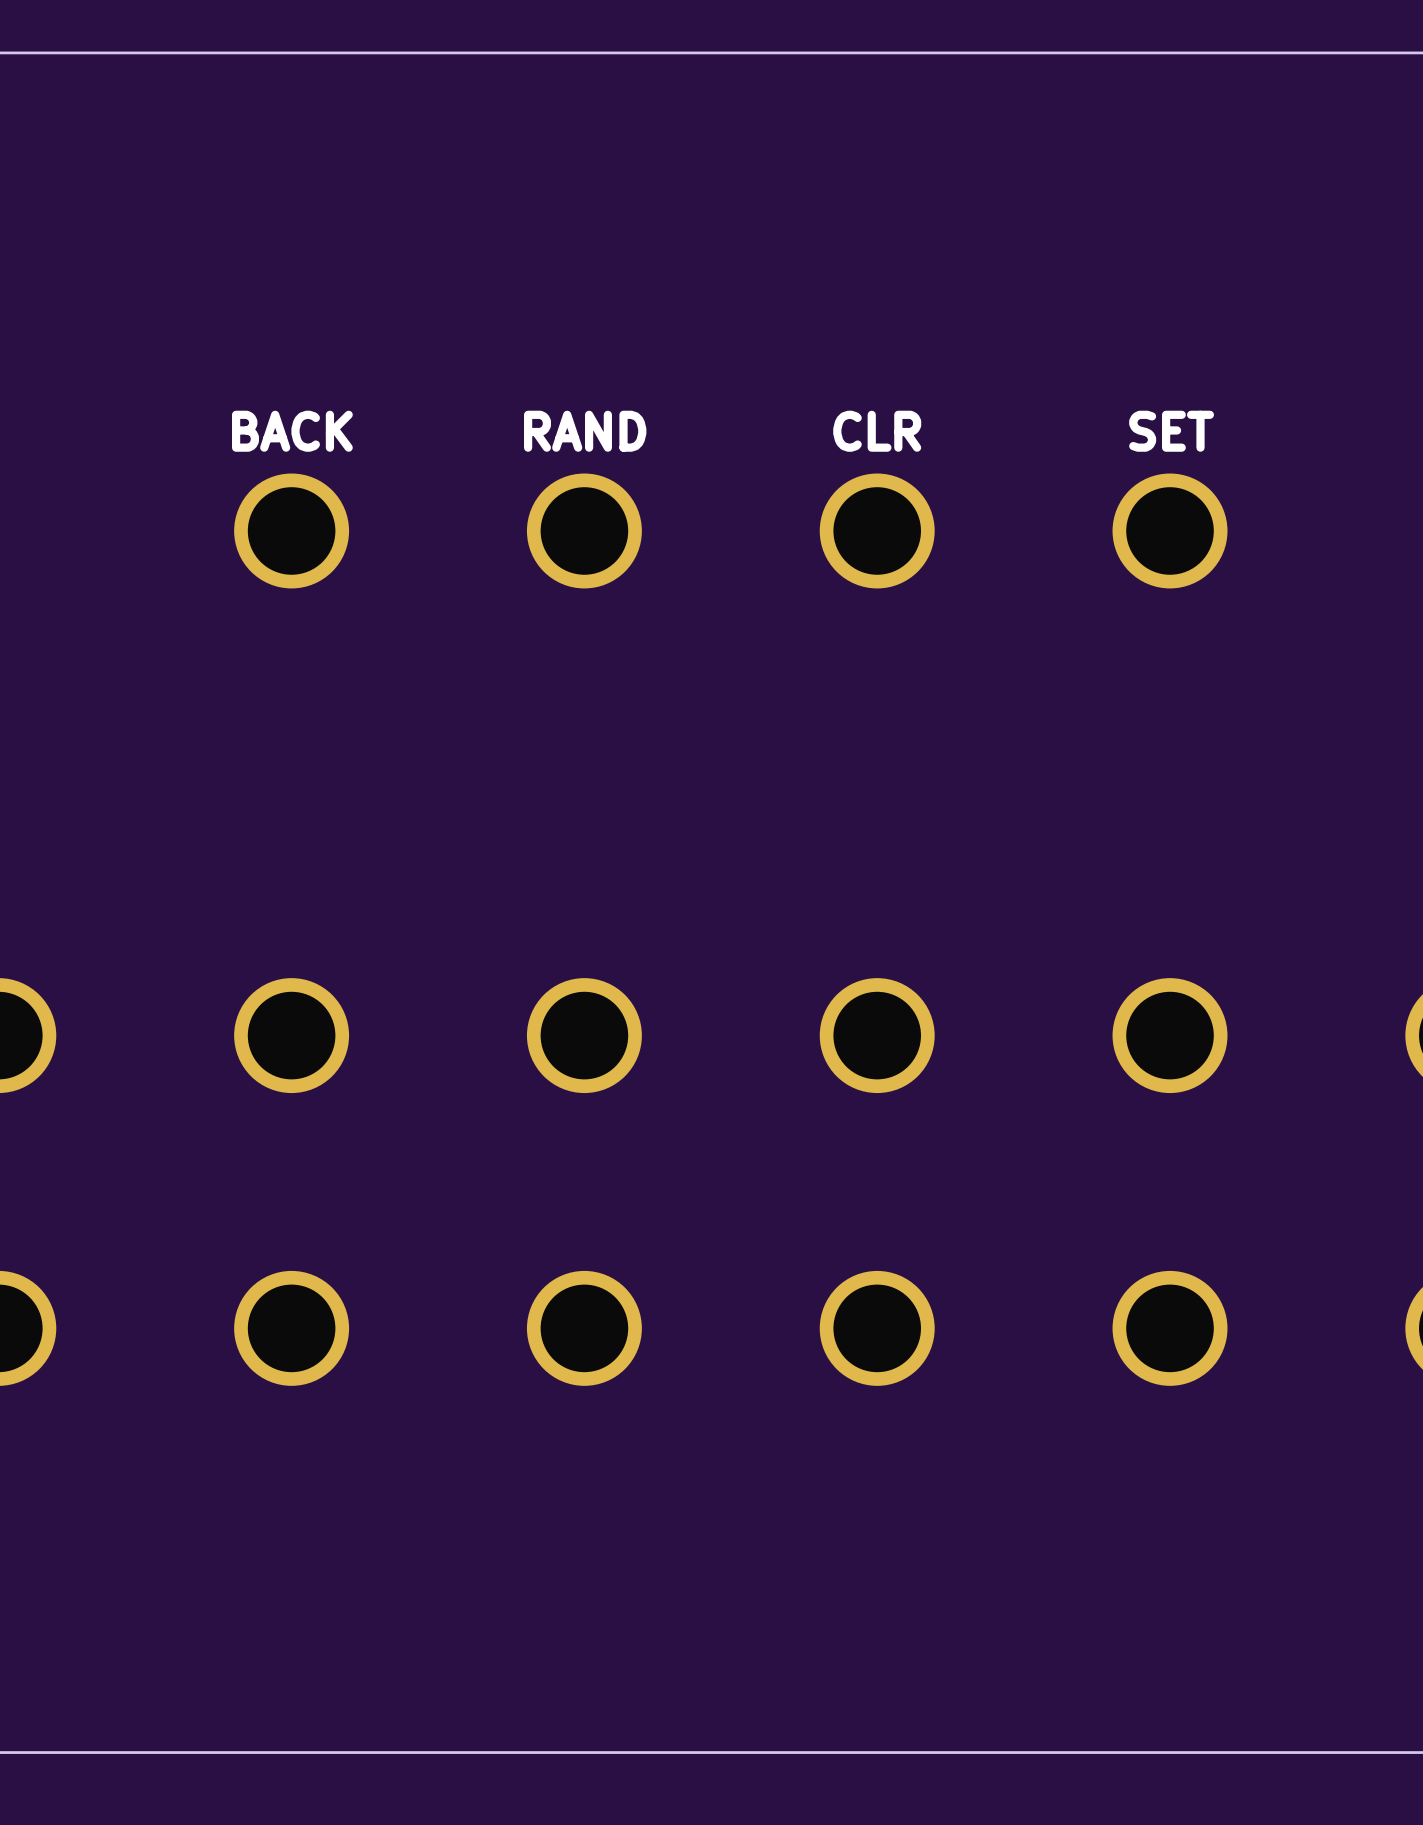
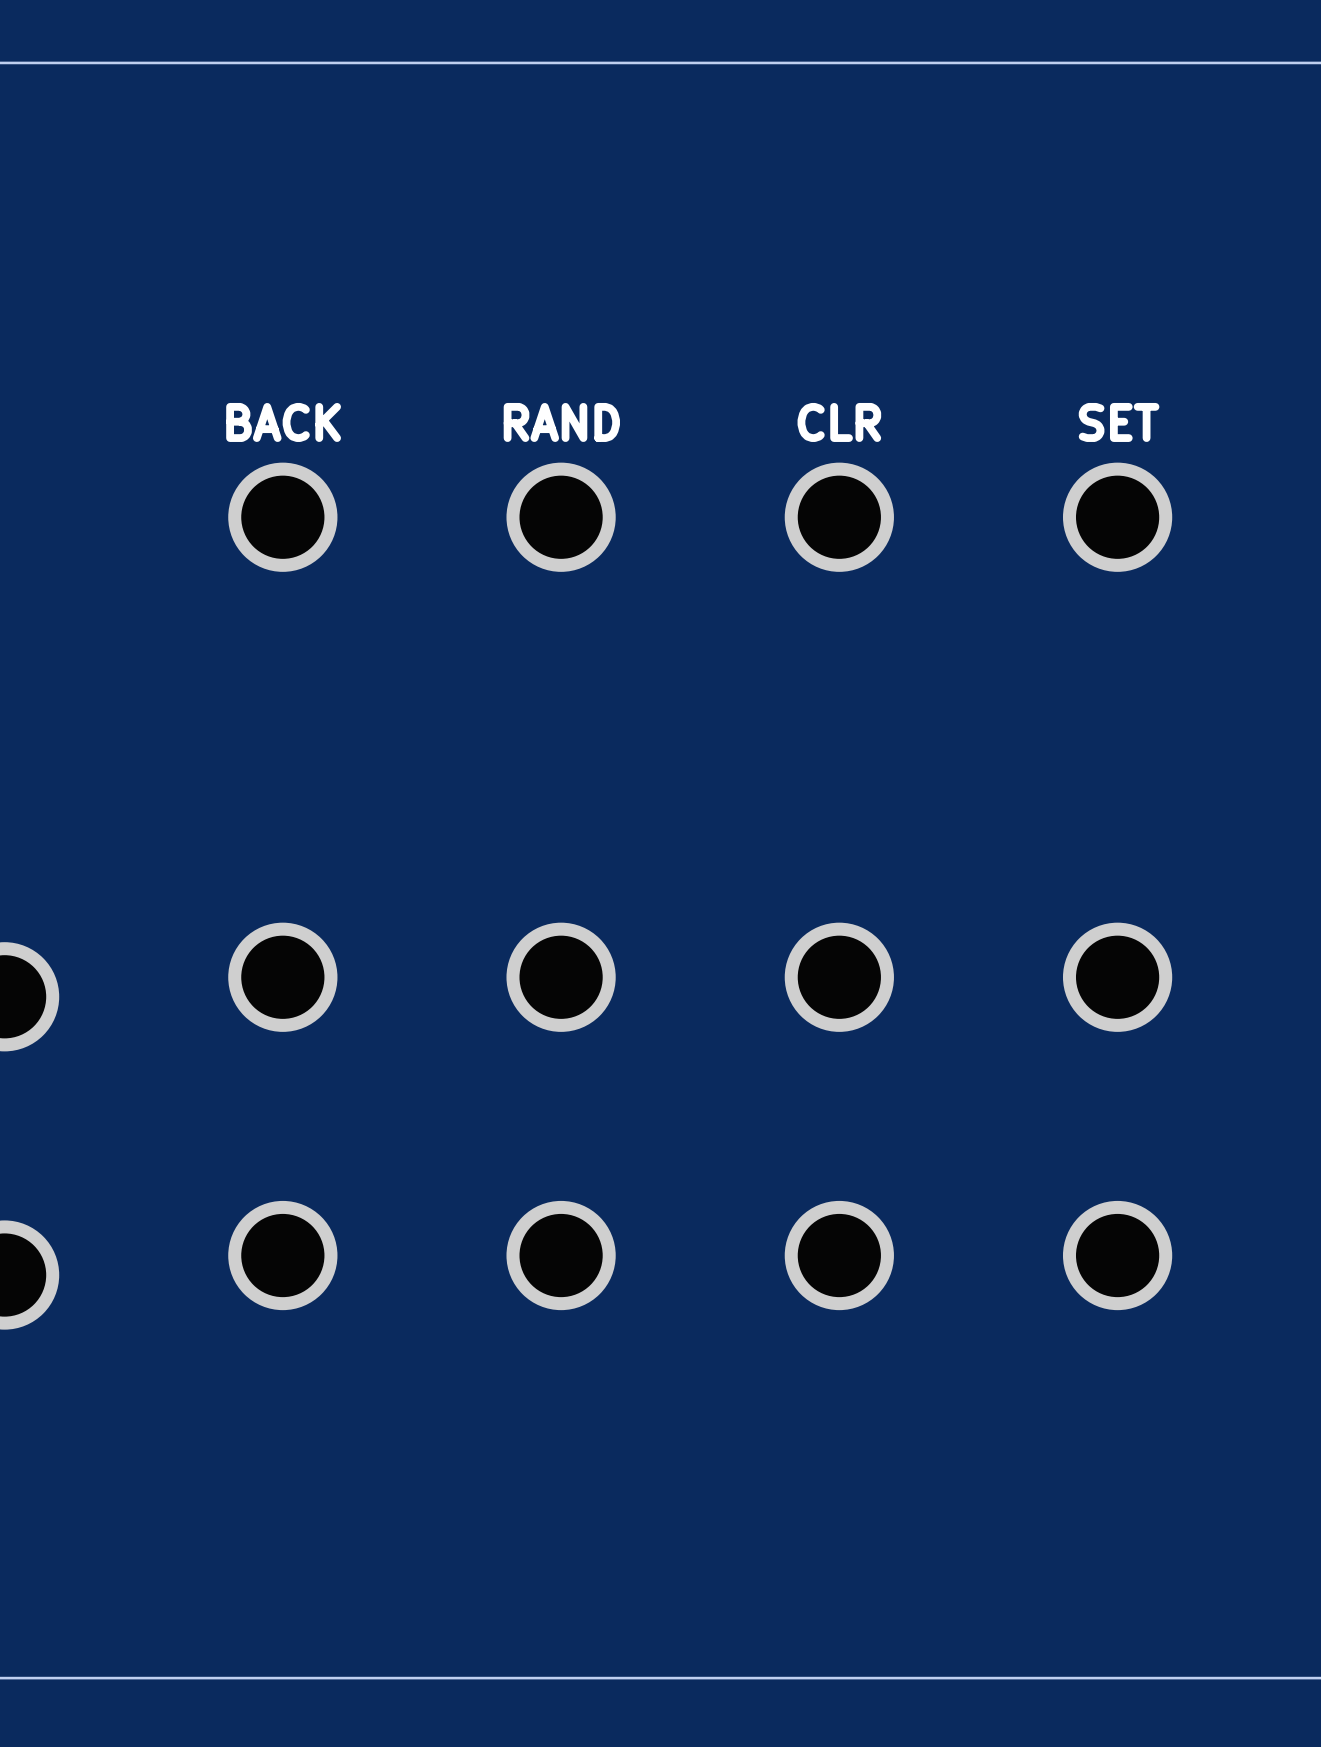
part position: (291, 1035) -> (282, 977)
part position: (584, 1035) -> (561, 977)
part position: (877, 1035) -> (839, 977)
part position: (1170, 1035) -> (1117, 977)
part position: (291, 1328) -> (282, 1255)
part position: (584, 1328) -> (561, 1255)
part position: (877, 1328) -> (839, 1255)
part position: (1170, 1328) -> (1117, 1255)

